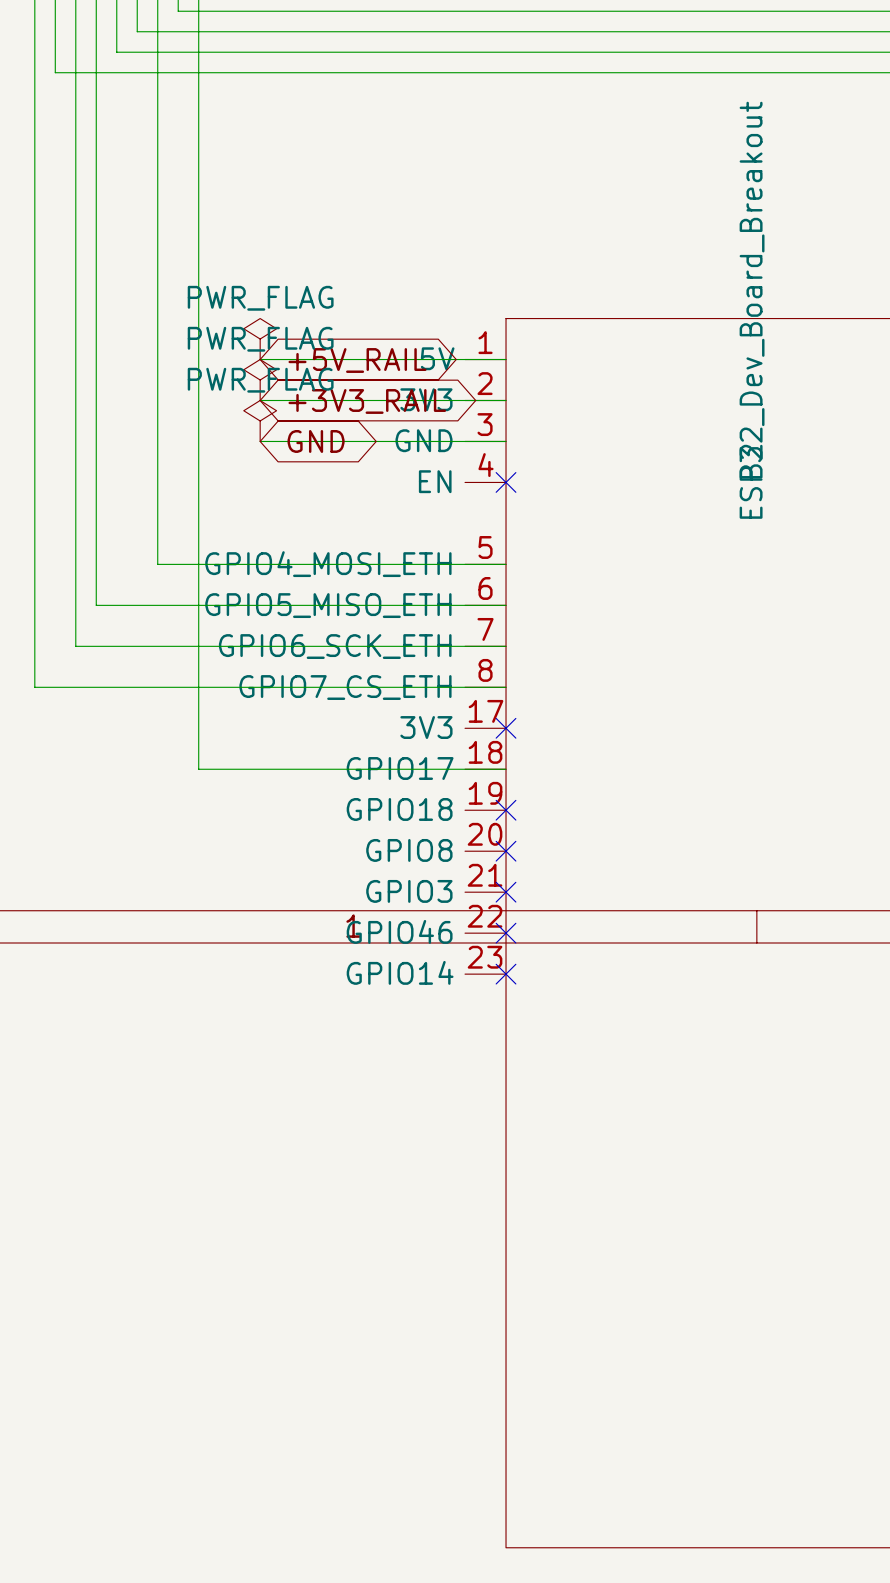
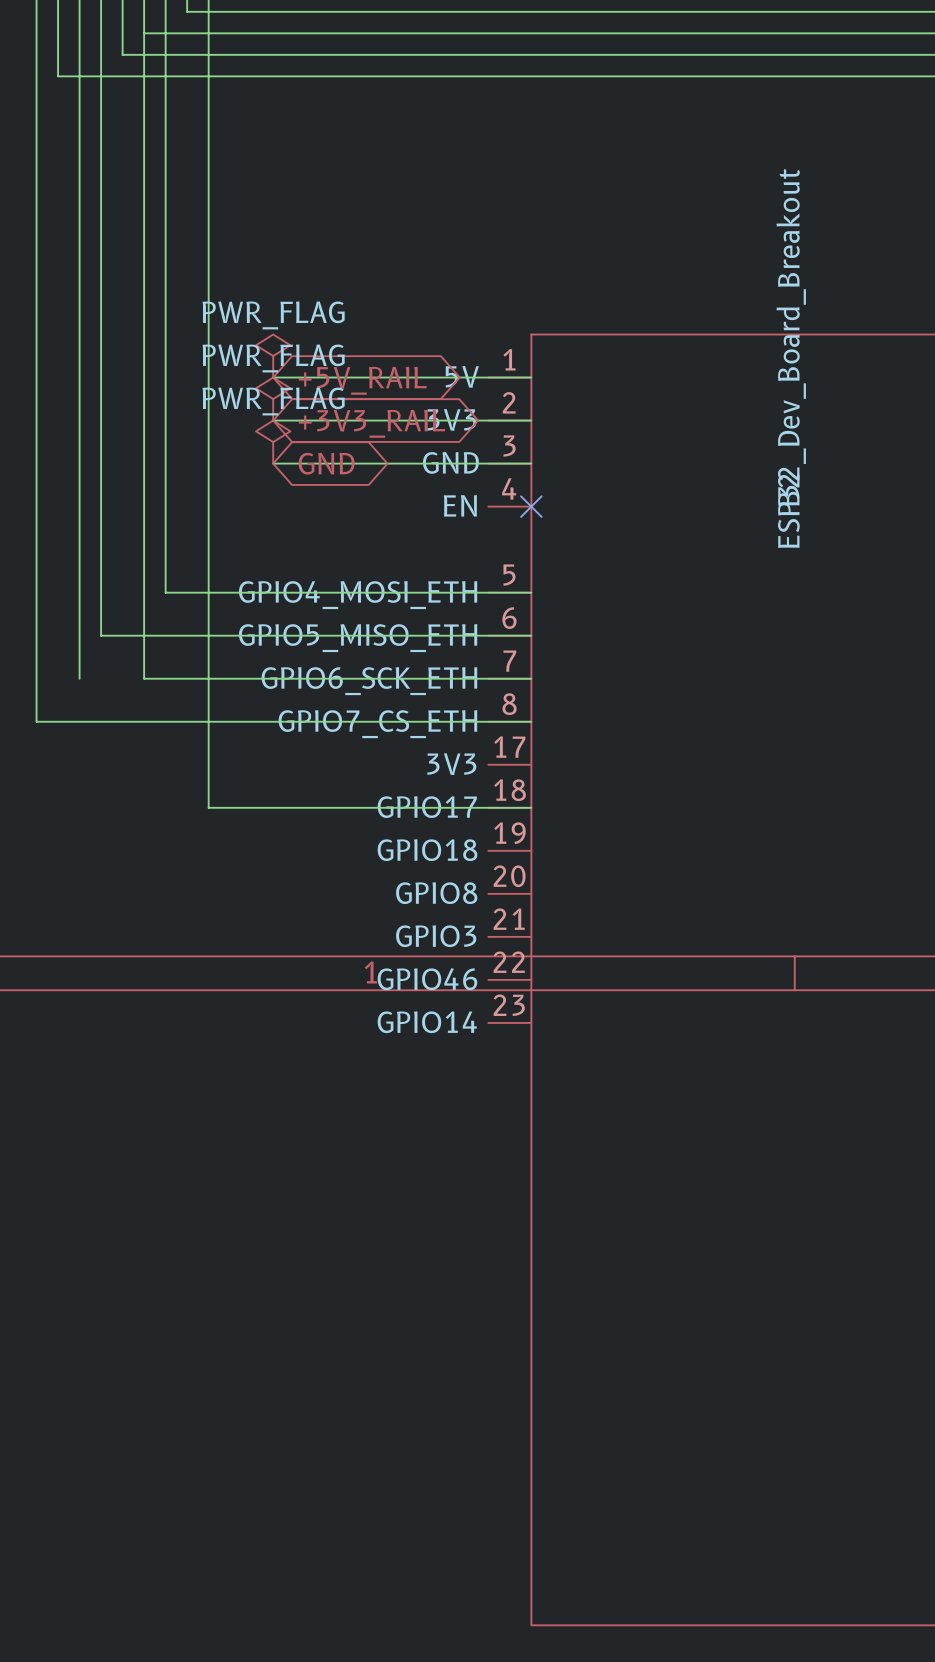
wire: (75, 646) (137, 646) -> (144, 33) (144, 678)
no-connect mark: (506, 728) -> none
no-connect mark: (506, 810) -> none
no-connect mark: (506, 851) -> none
no-connect mark: (506, 892) -> none
no-connect mark: (506, 933) -> none
no-connect mark: (506, 974) -> none

